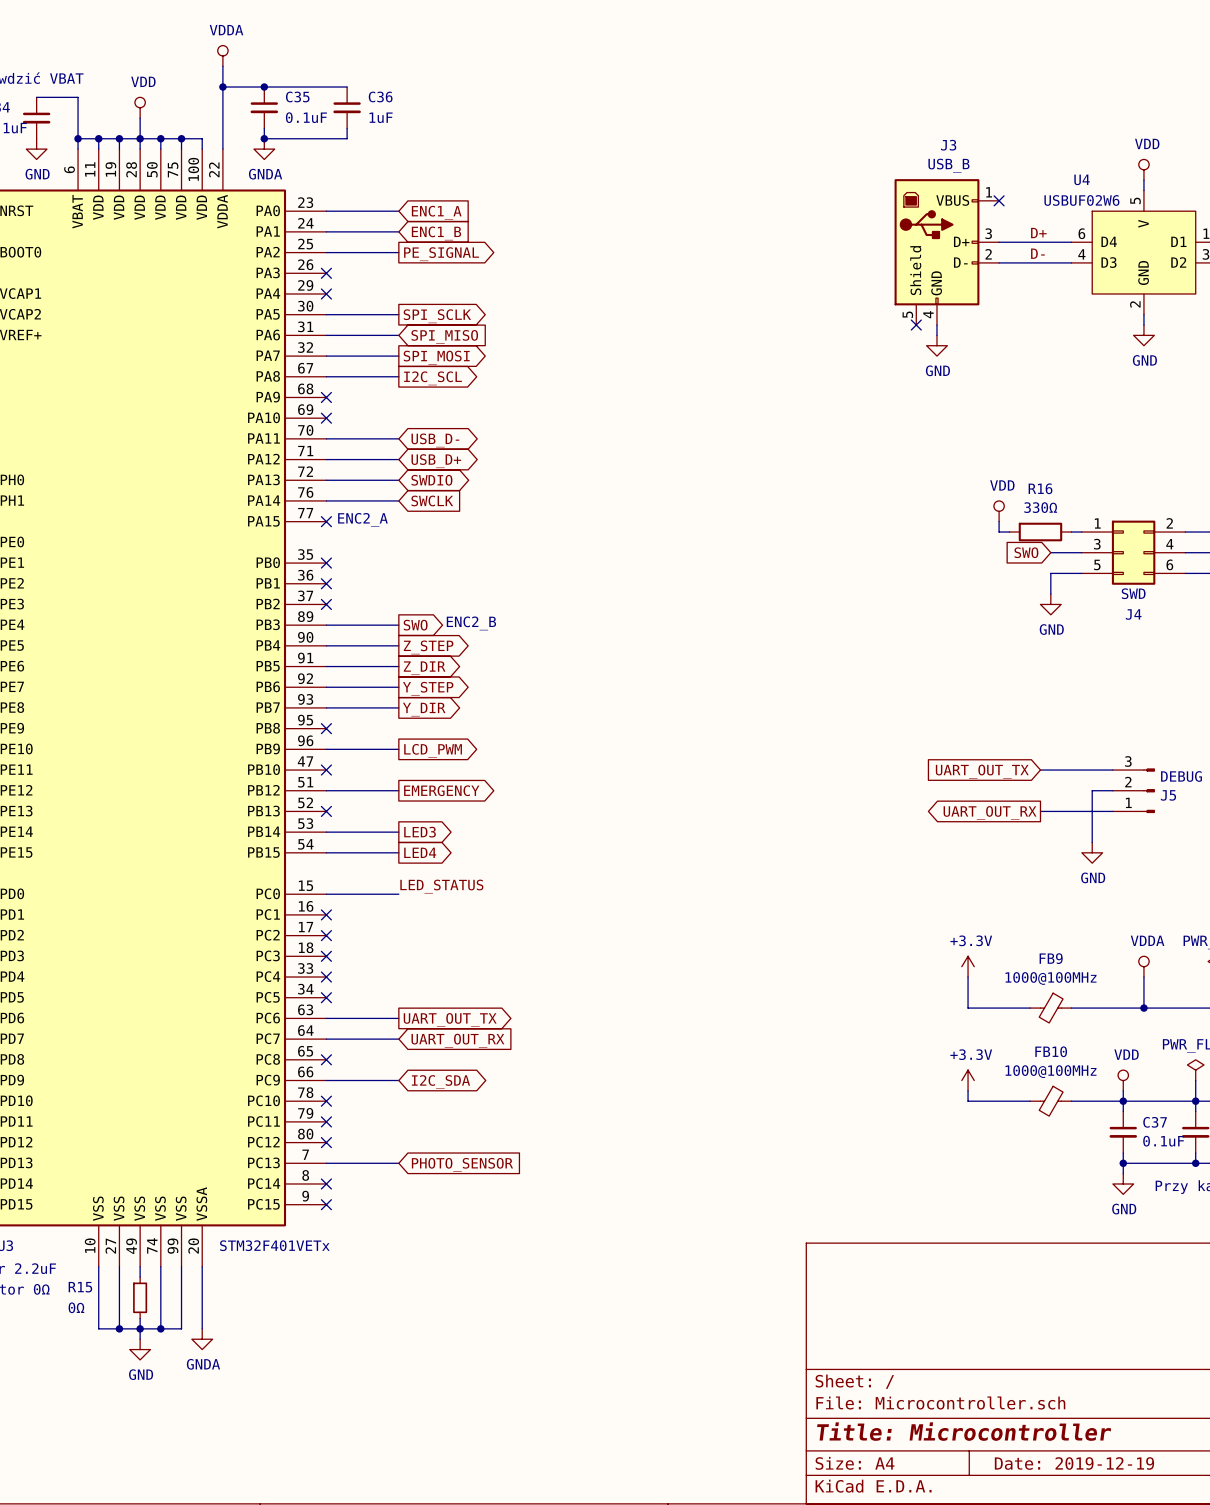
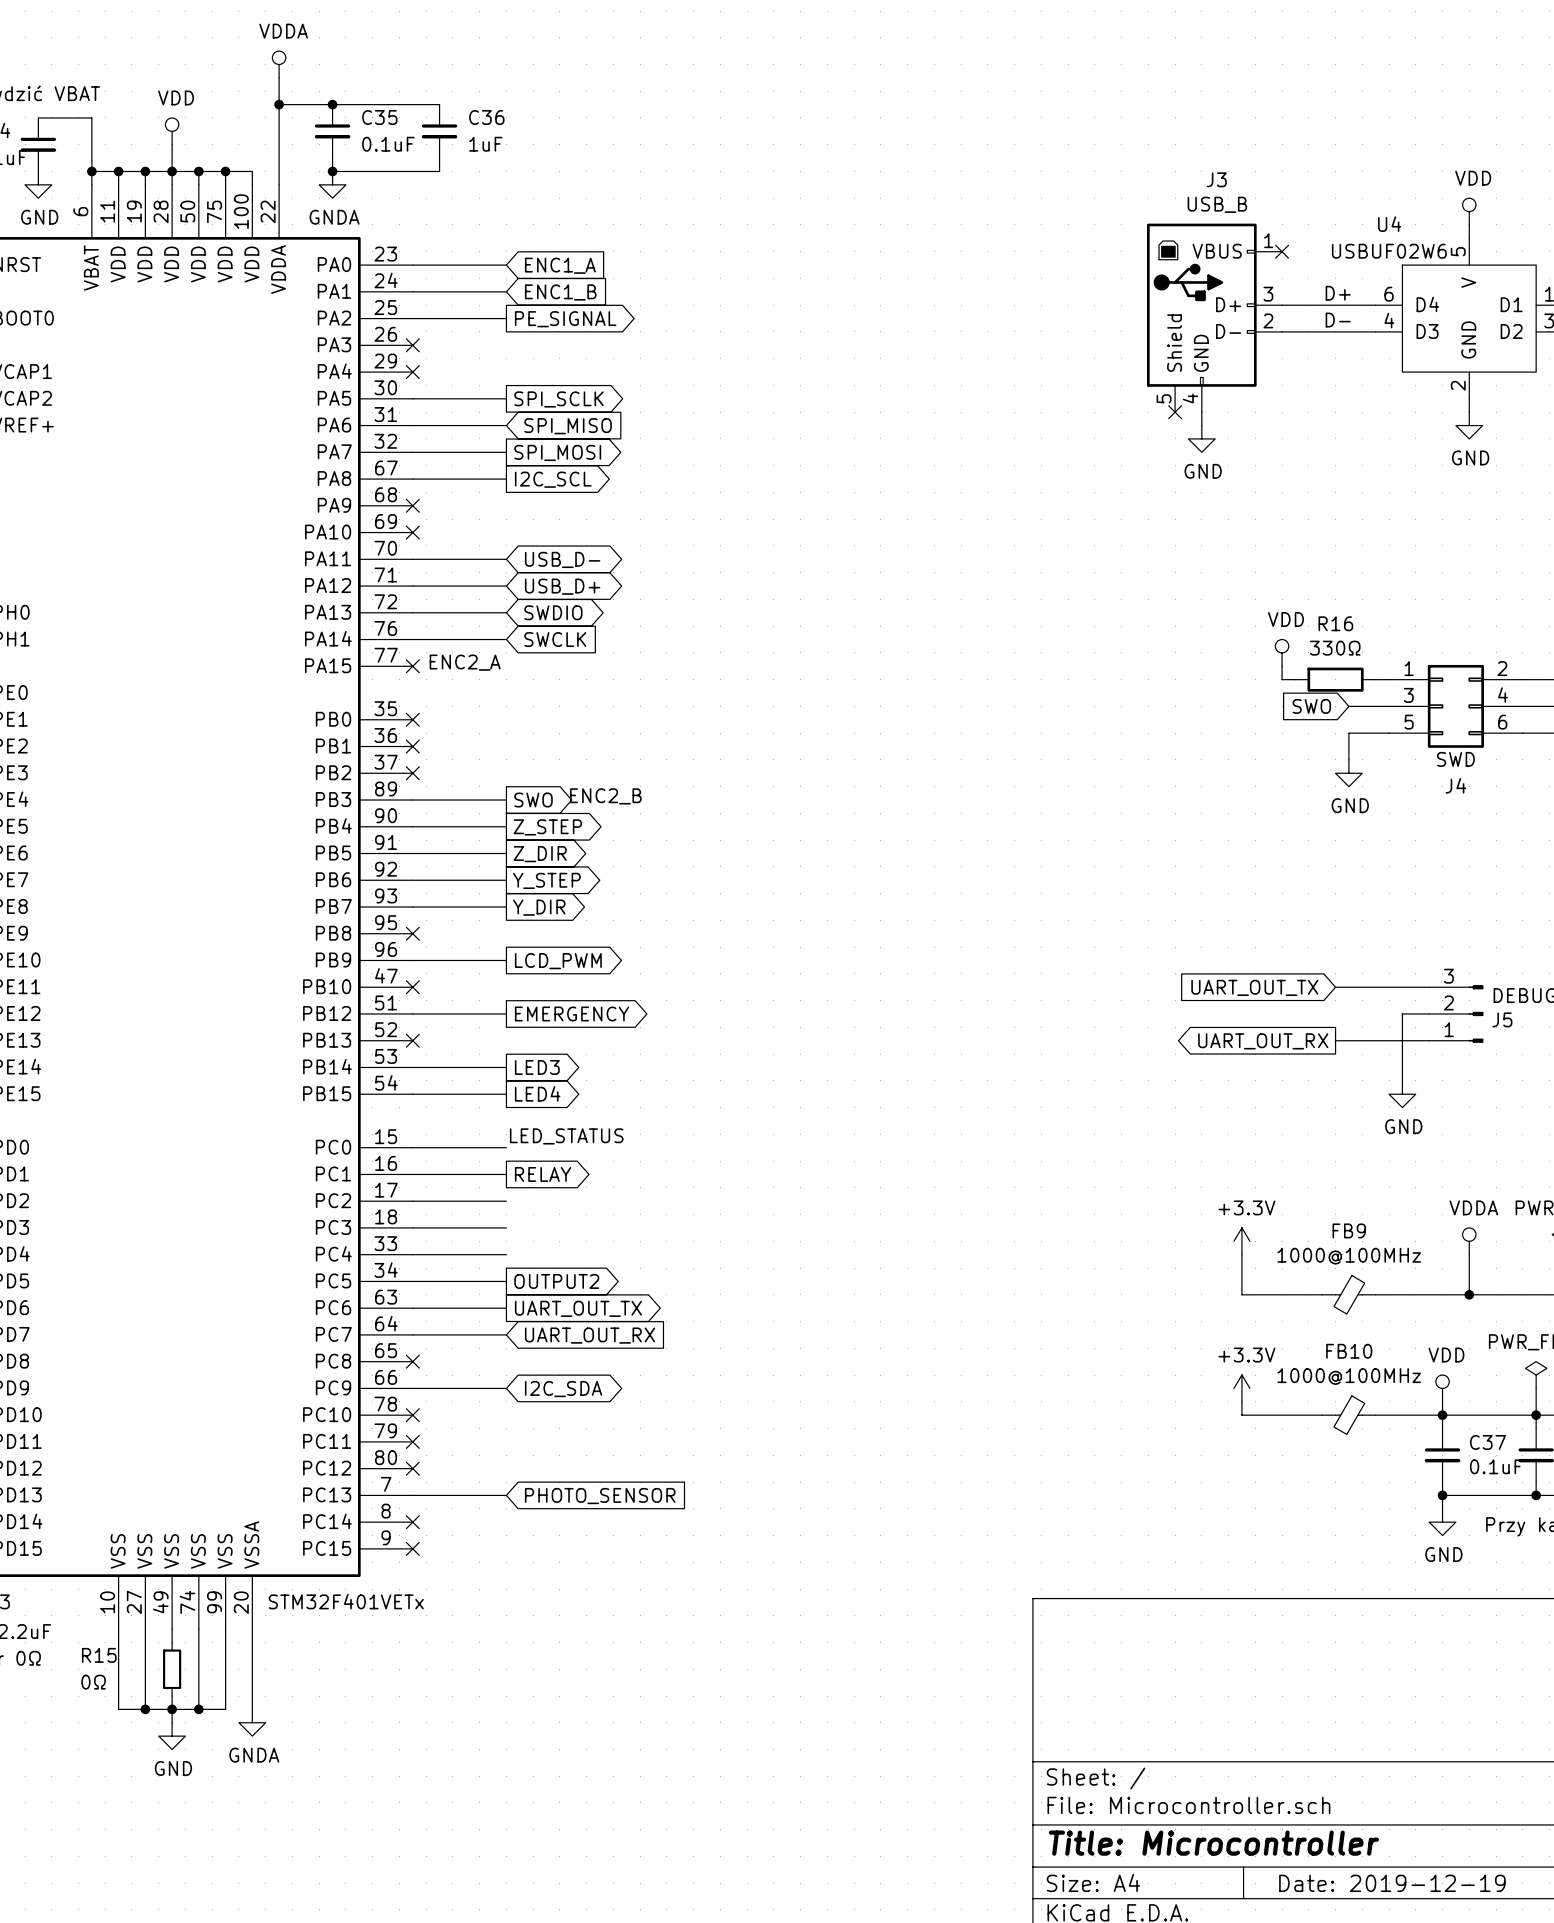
wire: none -> (412, 1174) (506, 1174)
no-connect mark: (326, 914) -> none
global label: none -> RELAY (543, 1174)
wire: none -> (412, 1201) (506, 1201)
no-connect mark: (326, 935) -> none
wire: none -> (412, 1227) (506, 1227)
no-connect mark: (326, 956) -> none
wire: none -> (412, 1254) (506, 1254)
no-connect mark: (326, 977) -> none
wire: none -> (412, 1281) (506, 1281)
no-connect mark: (326, 997) -> none
global label: none -> OUTPUT2 (556, 1281)

